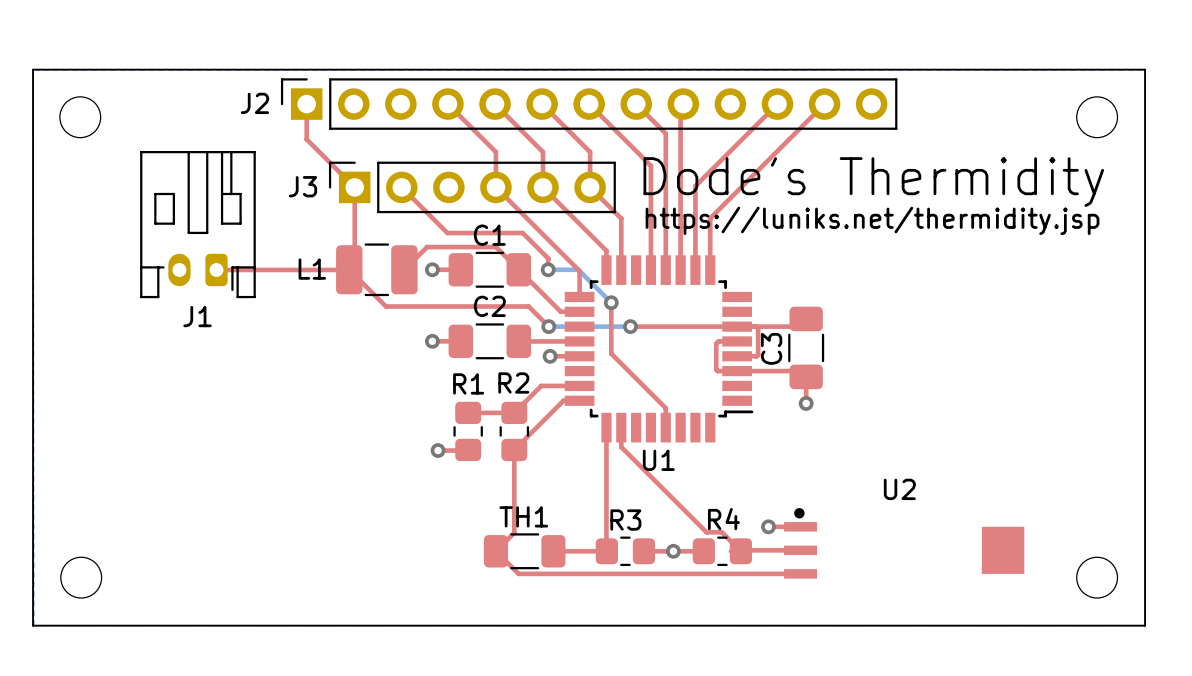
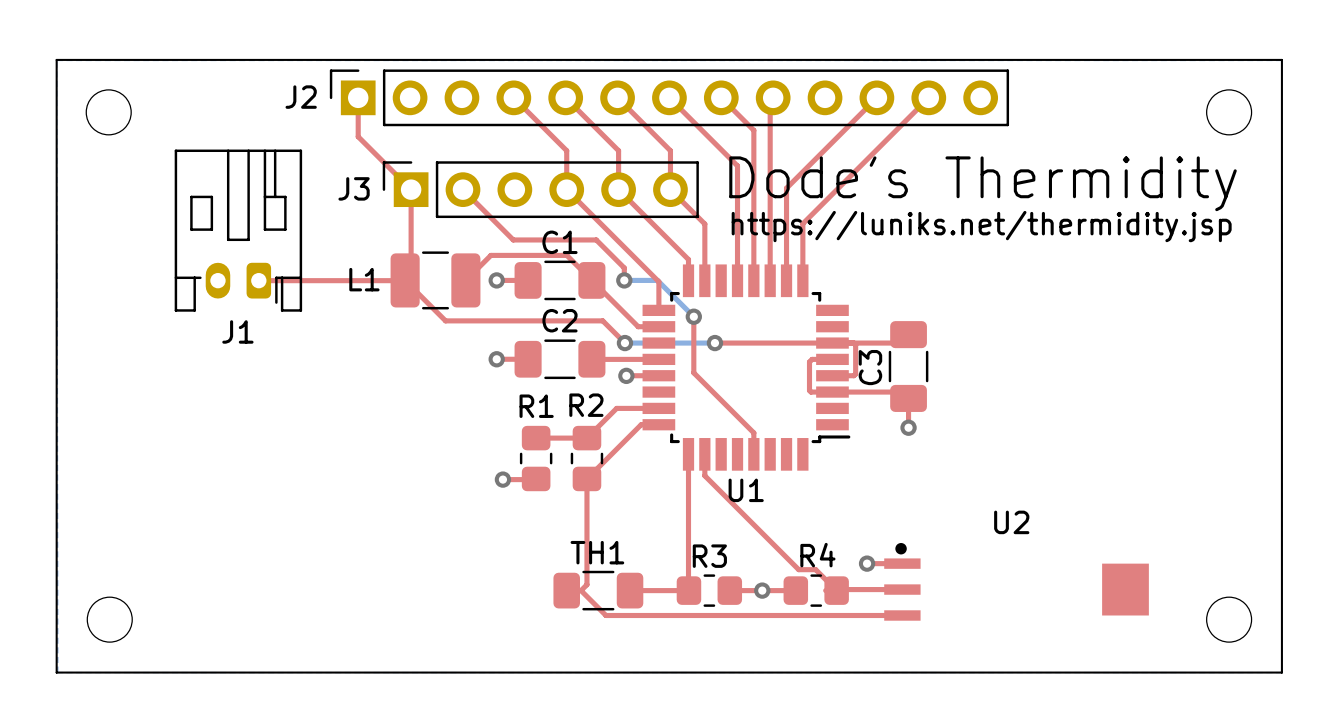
top track: (514, 532) (495, 551) (518, 573) (531, 573) -> (586, 570) (586, 584) (581, 590) (605, 615)

